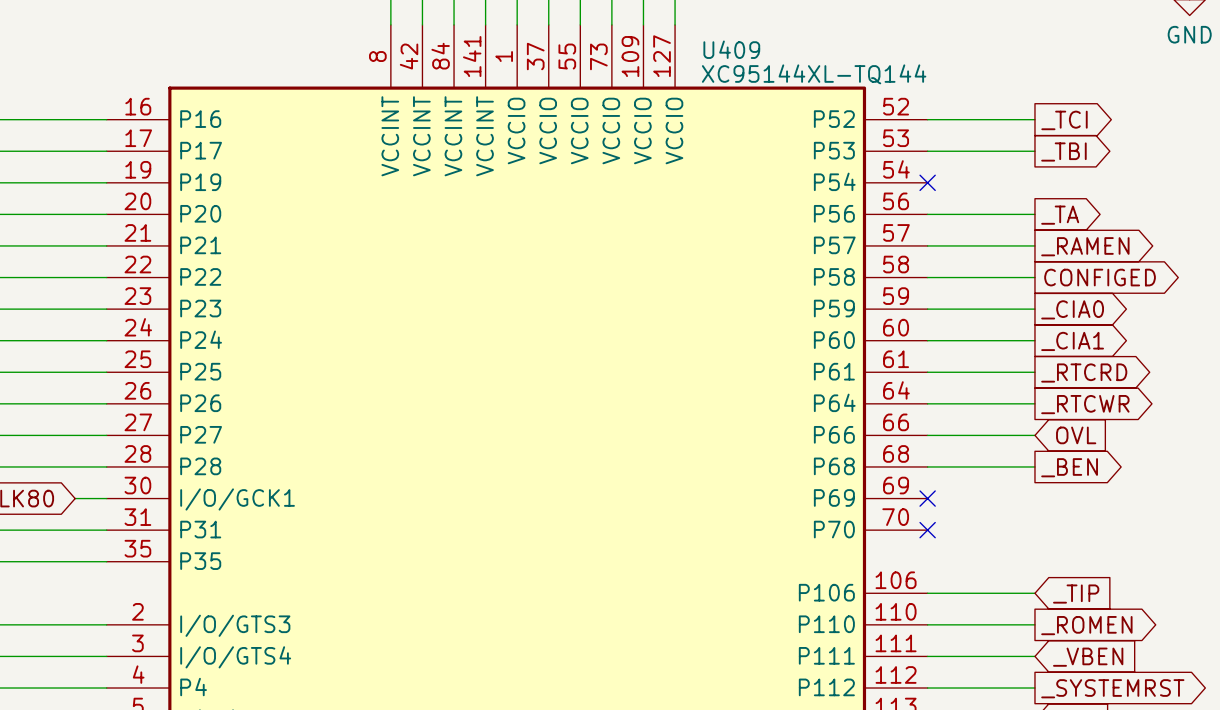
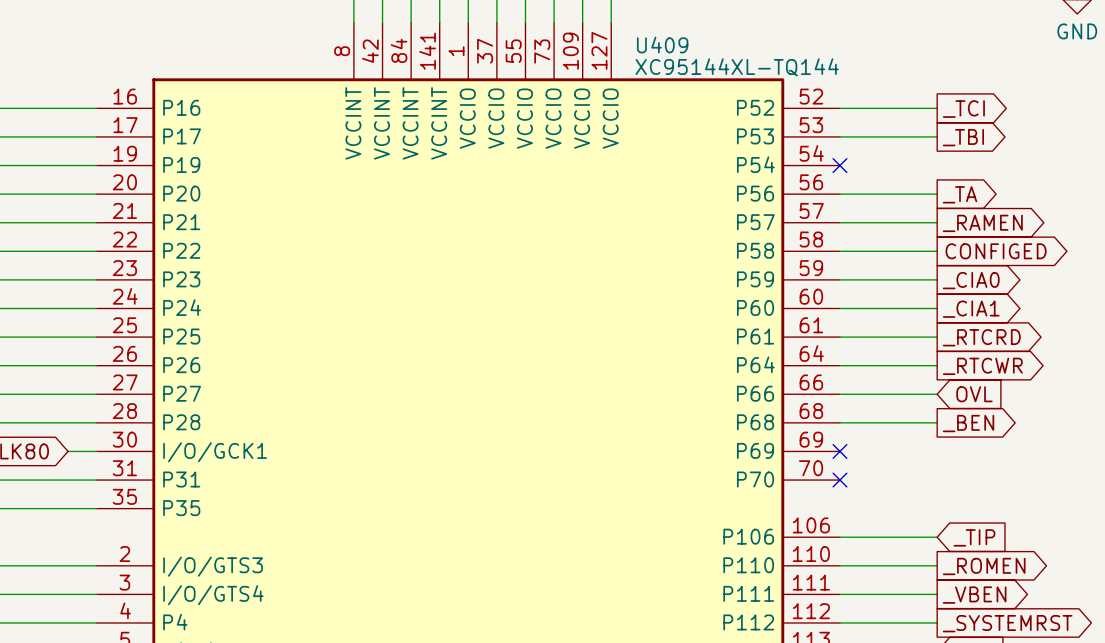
global label shape: input (1088, 657) -> output (974, 595)

